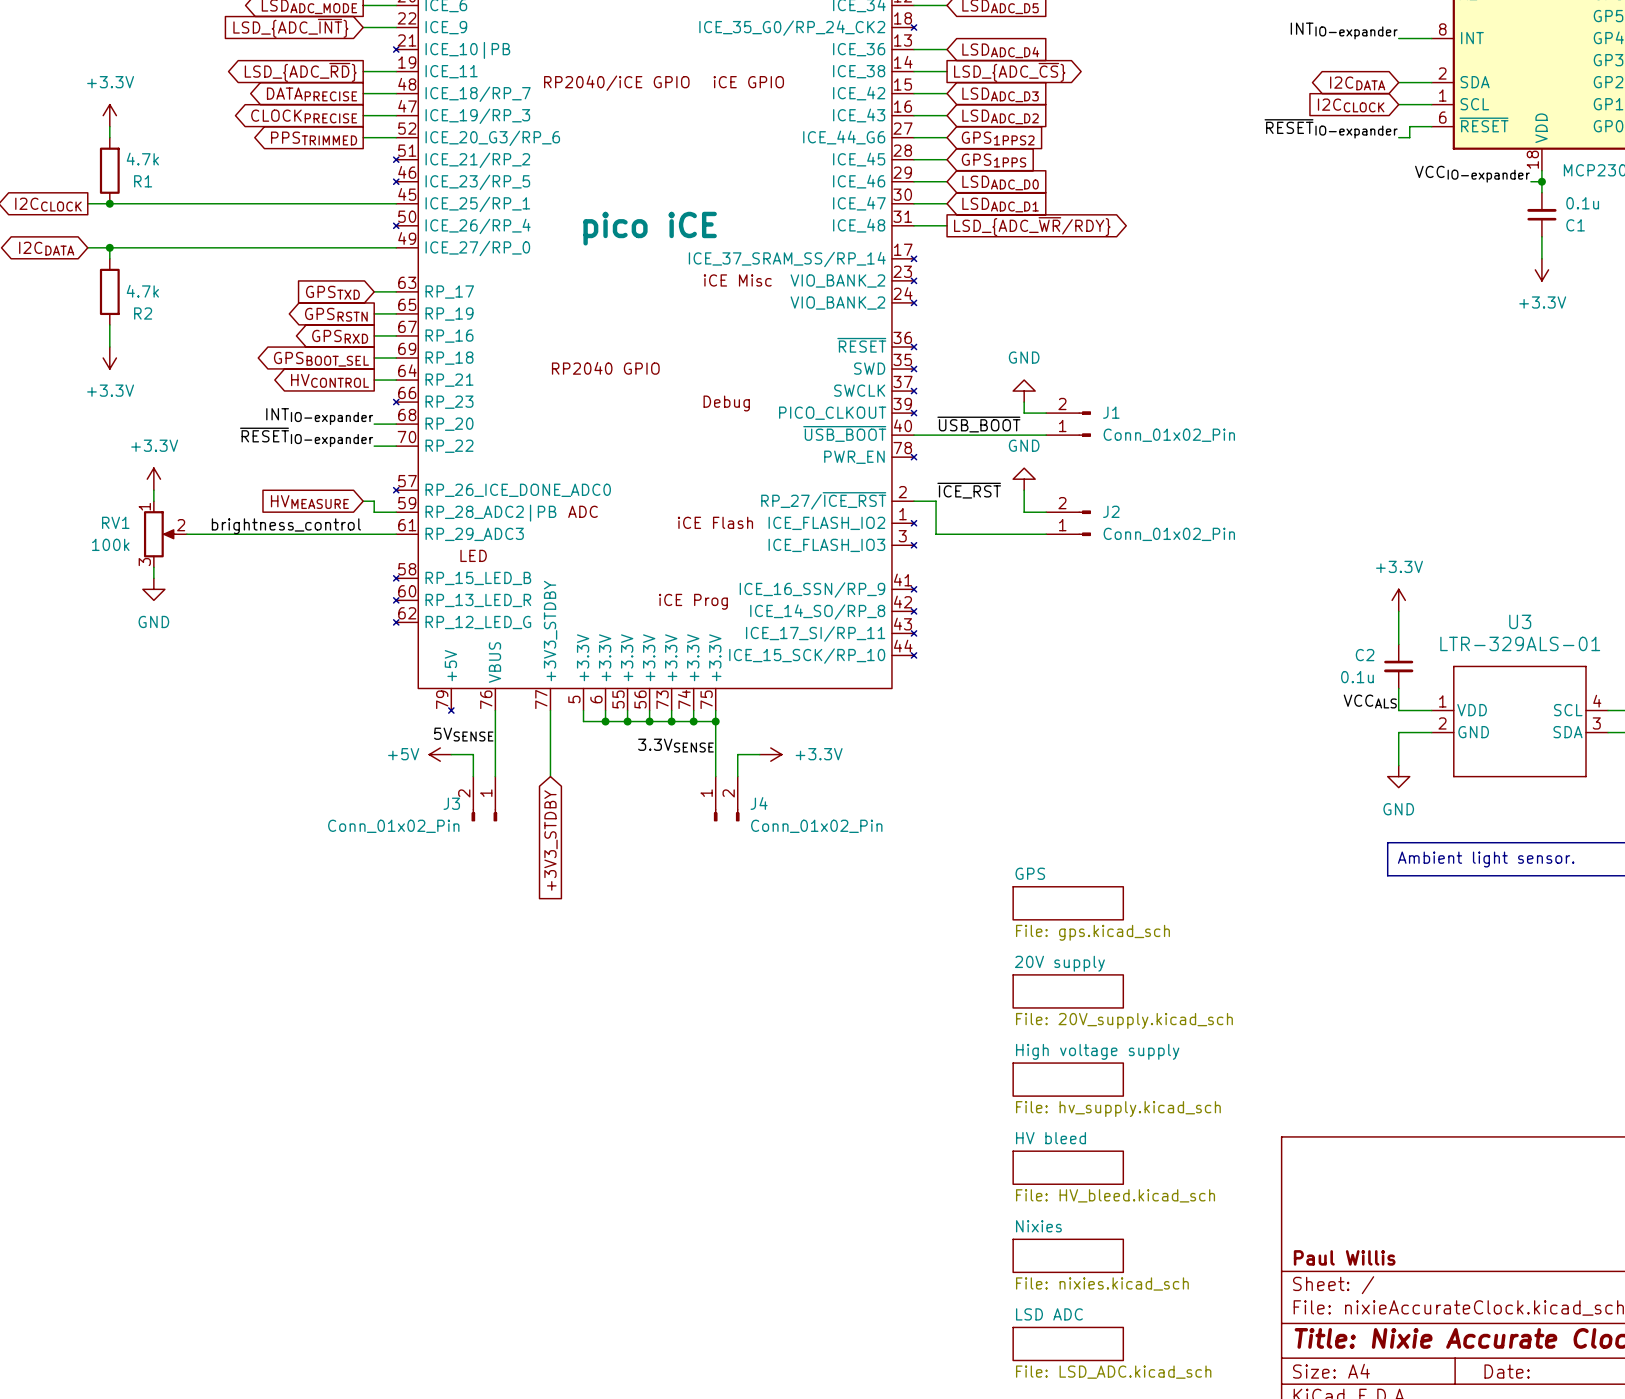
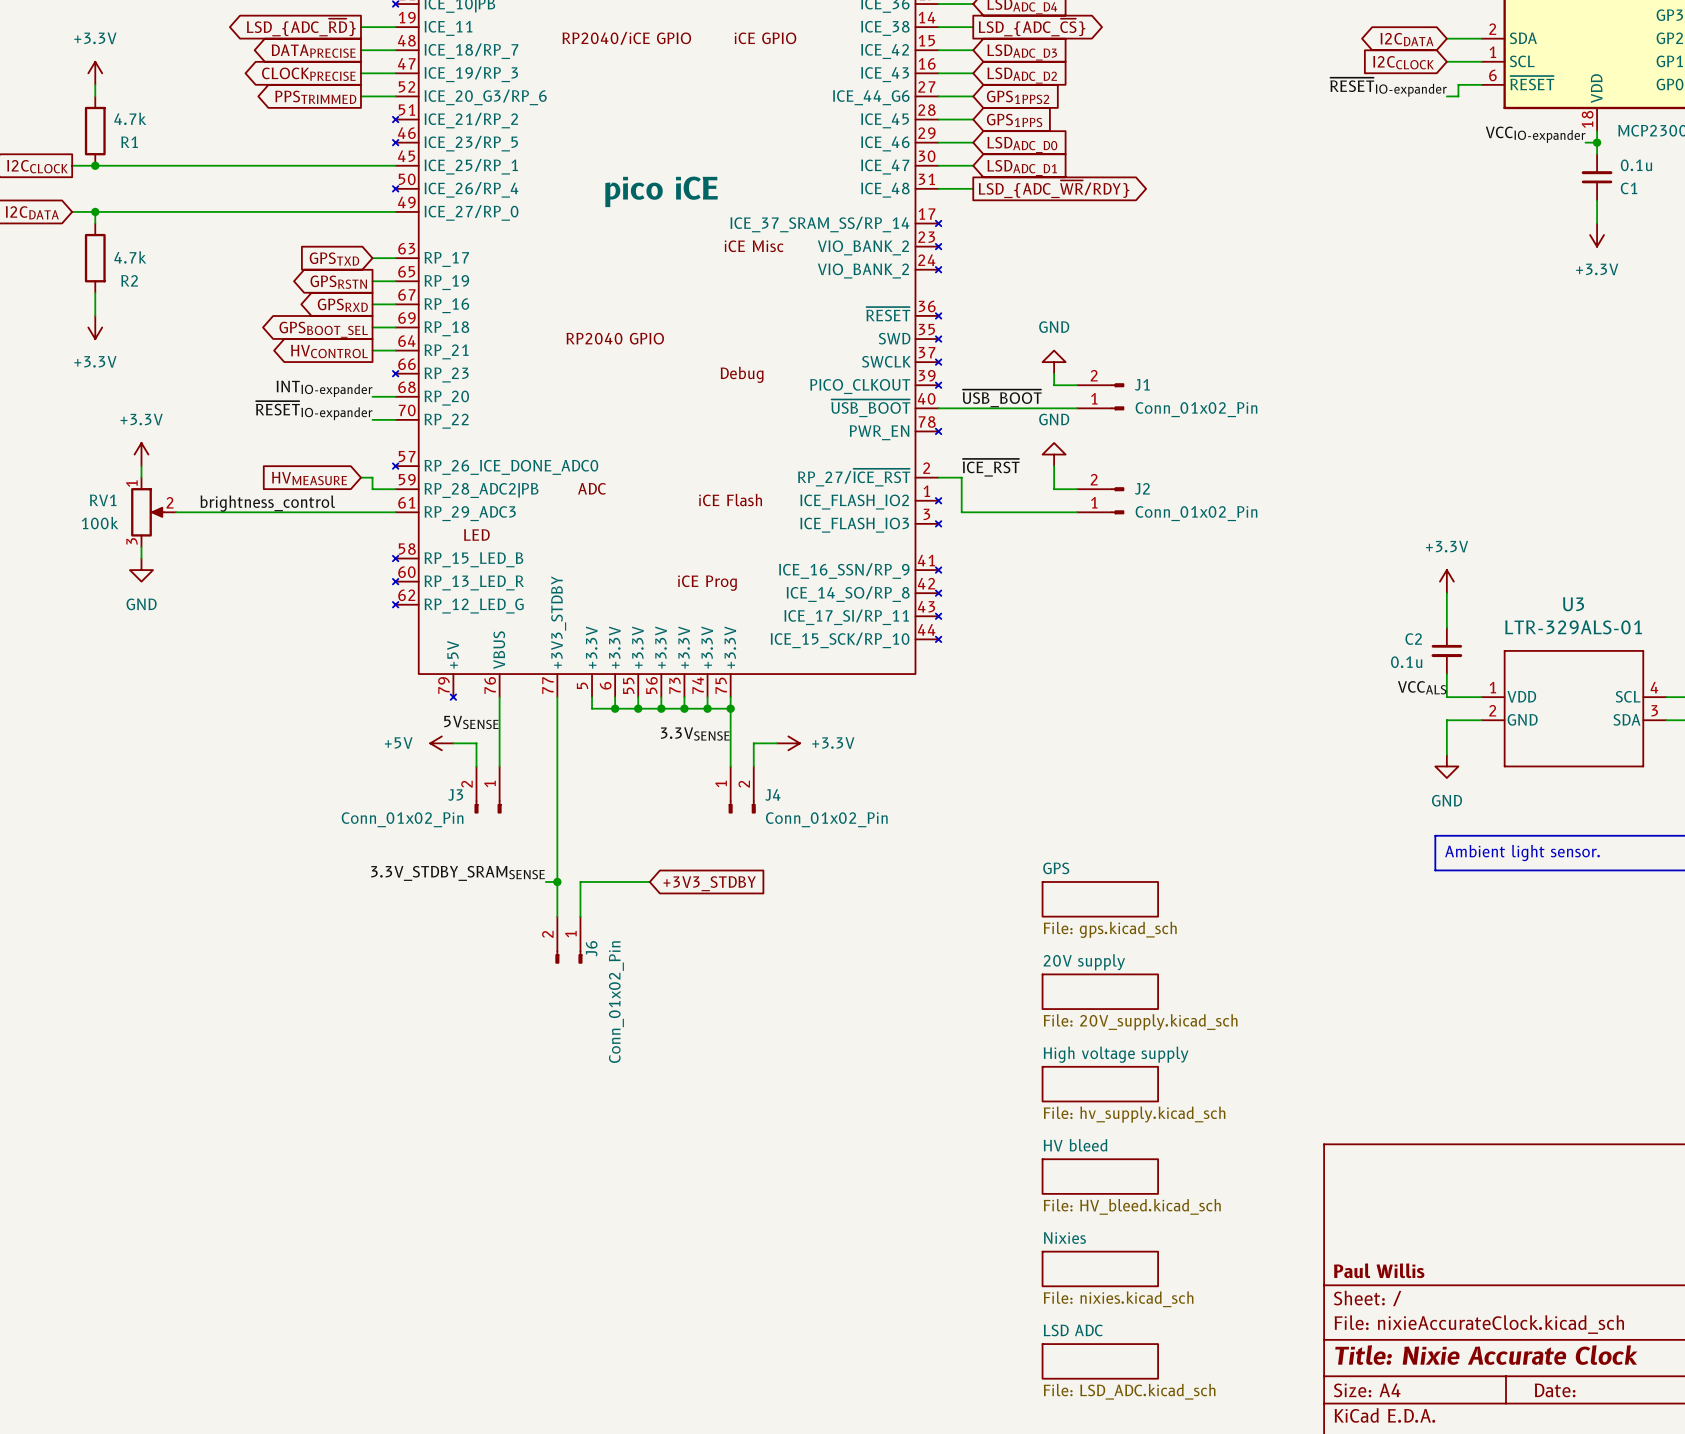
wire: none -> (557, 766) (557, 916)
global label rotation: 0° (550, 840) -> 90° counterclockwise (709, 883)
global label position: +3V3_STDBY (550, 840) -> +3V3_STDBY (709, 883)
label: none -> 3.3V_STDBY_SRAMSENSE (458, 873)
wire: none -> (545, 881) (557, 881)
junction: none -> (557, 881)
wire: none -> (649, 881) (580, 881) (580, 916)
J6: none -> Conn_01x02_Pin (568, 940)

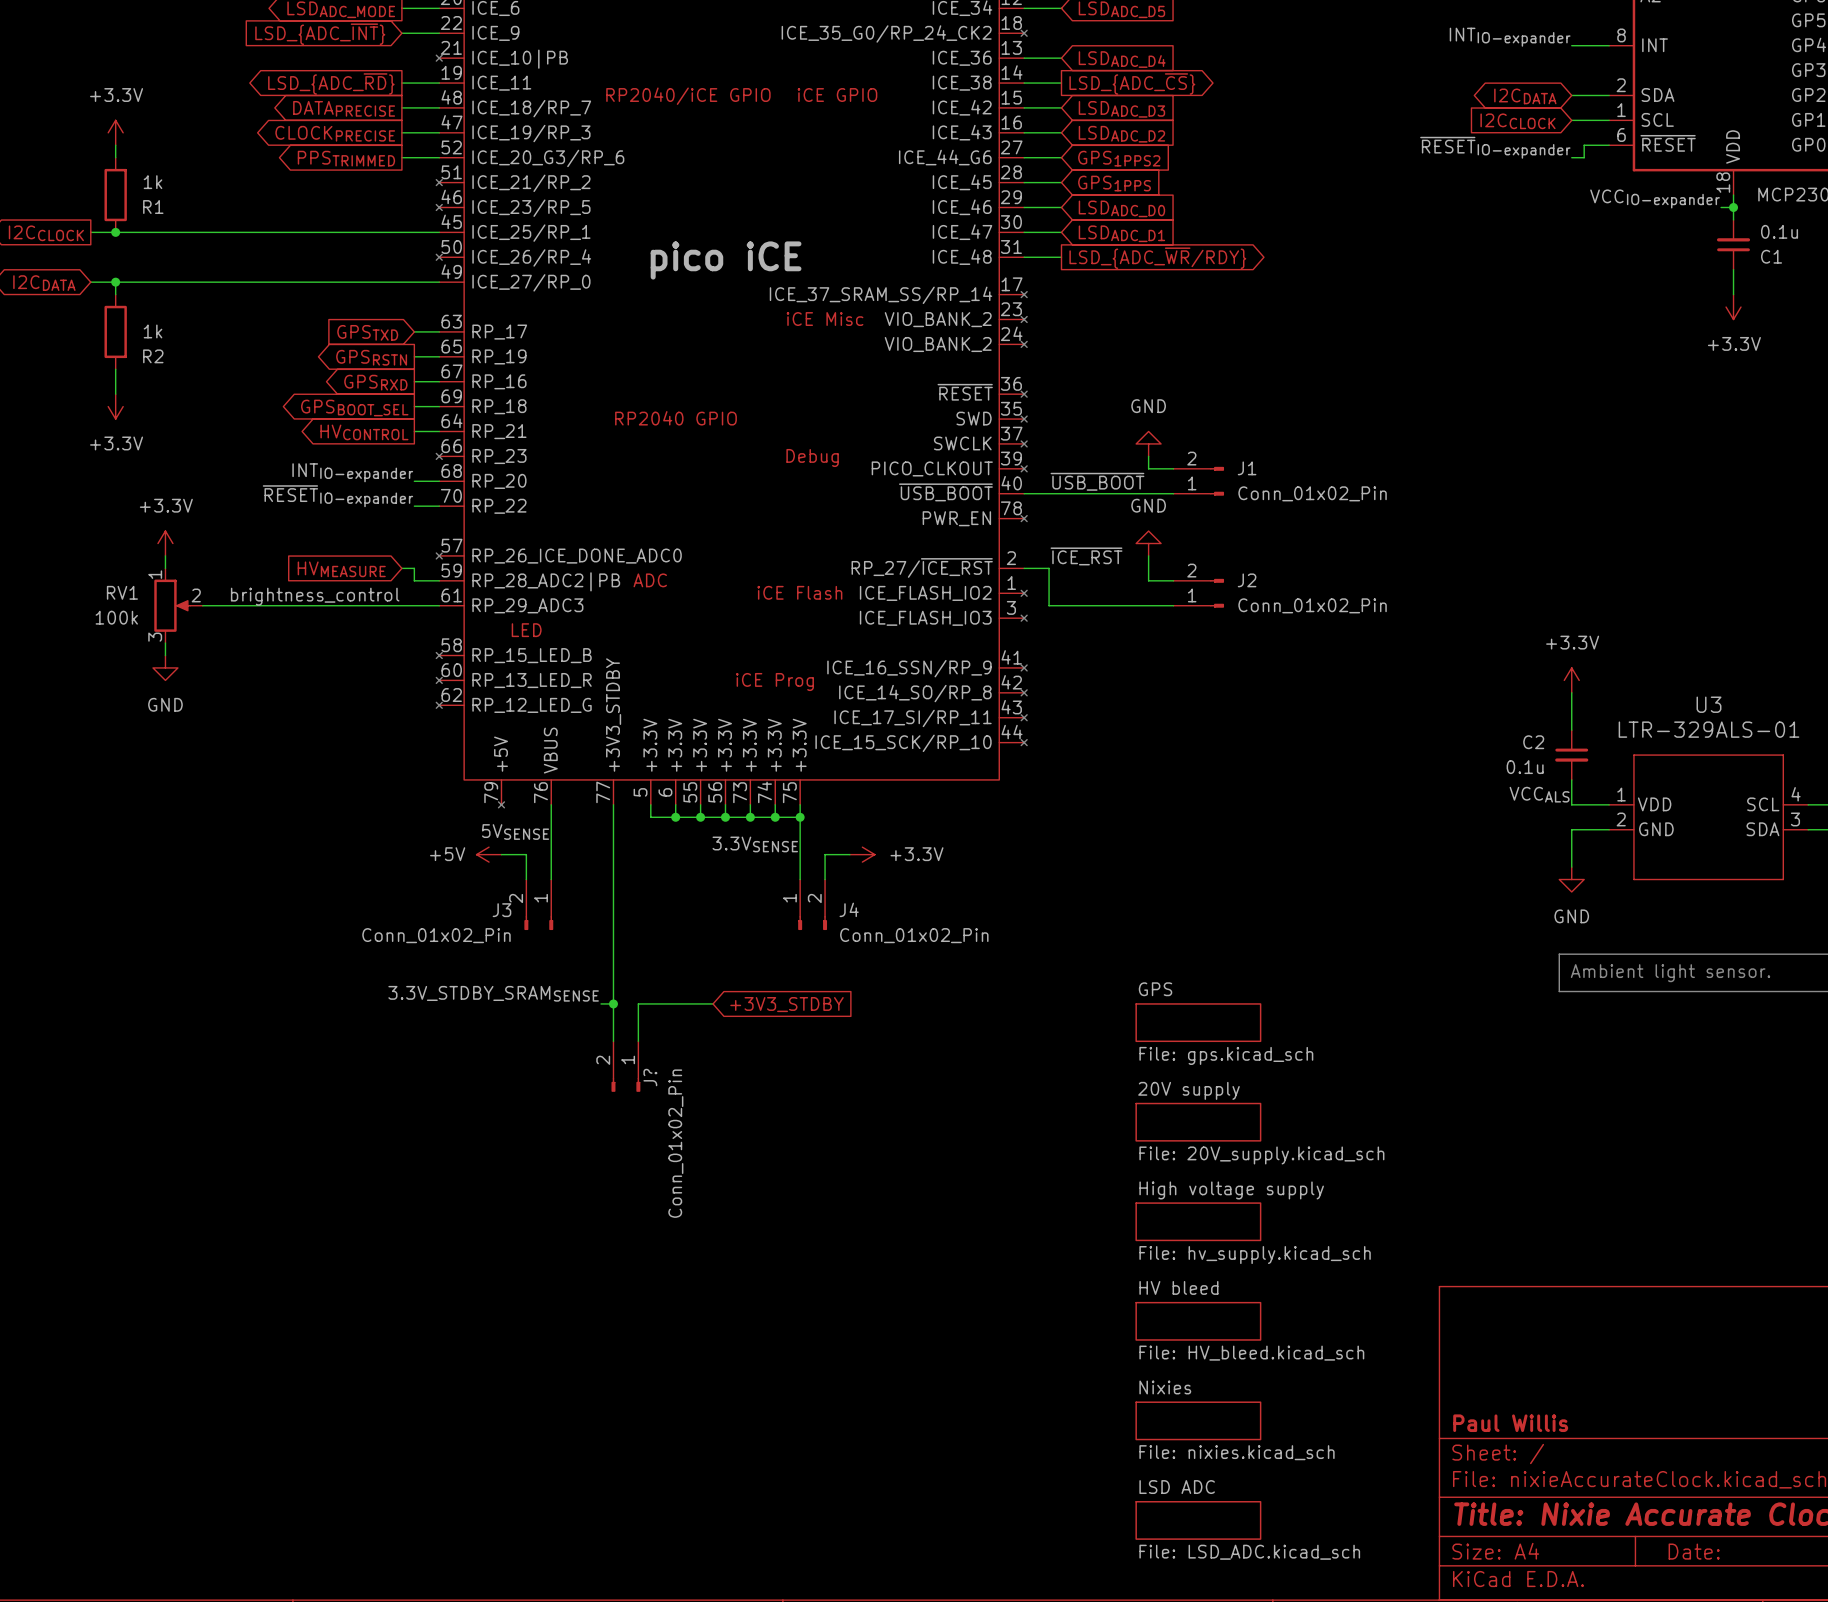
R1 value: 4.7k (130, 118) -> 1k (153, 182)
R2 value: 4.7k (130, 257) -> 1k (153, 331)
J6 name: J6 (591, 948) -> J? (650, 1077)

